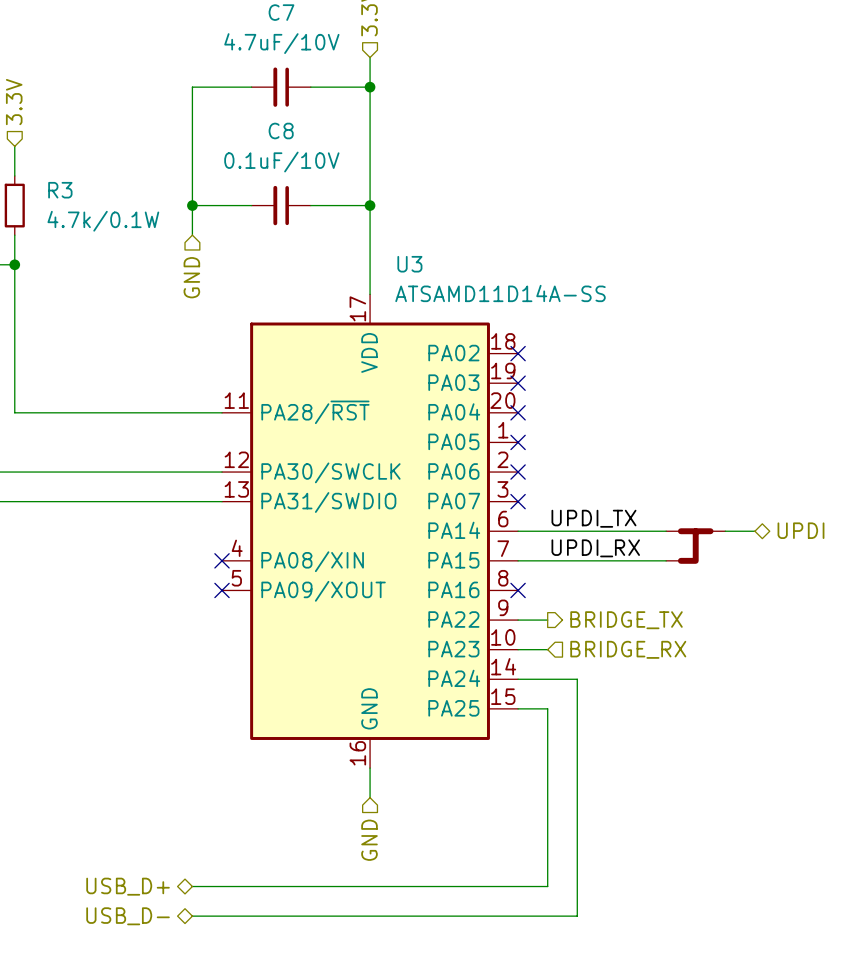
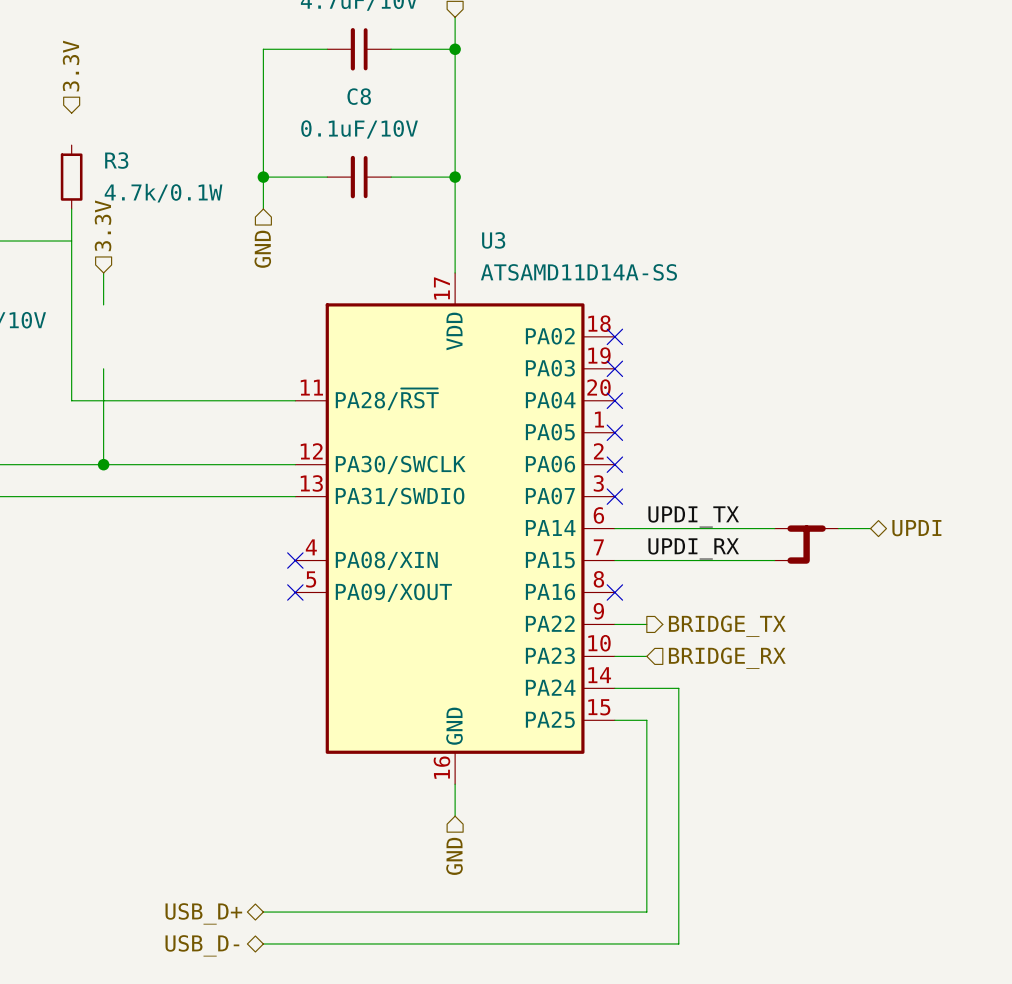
wire: (14, 146) (14, 175) -> (103, 272) (103, 304)
hierarchical label: none -> 3.3V (103, 225)
junction: (14, 264) -> none
wire: none -> (103, 368) (103, 464)
junction: none -> (103, 464)

